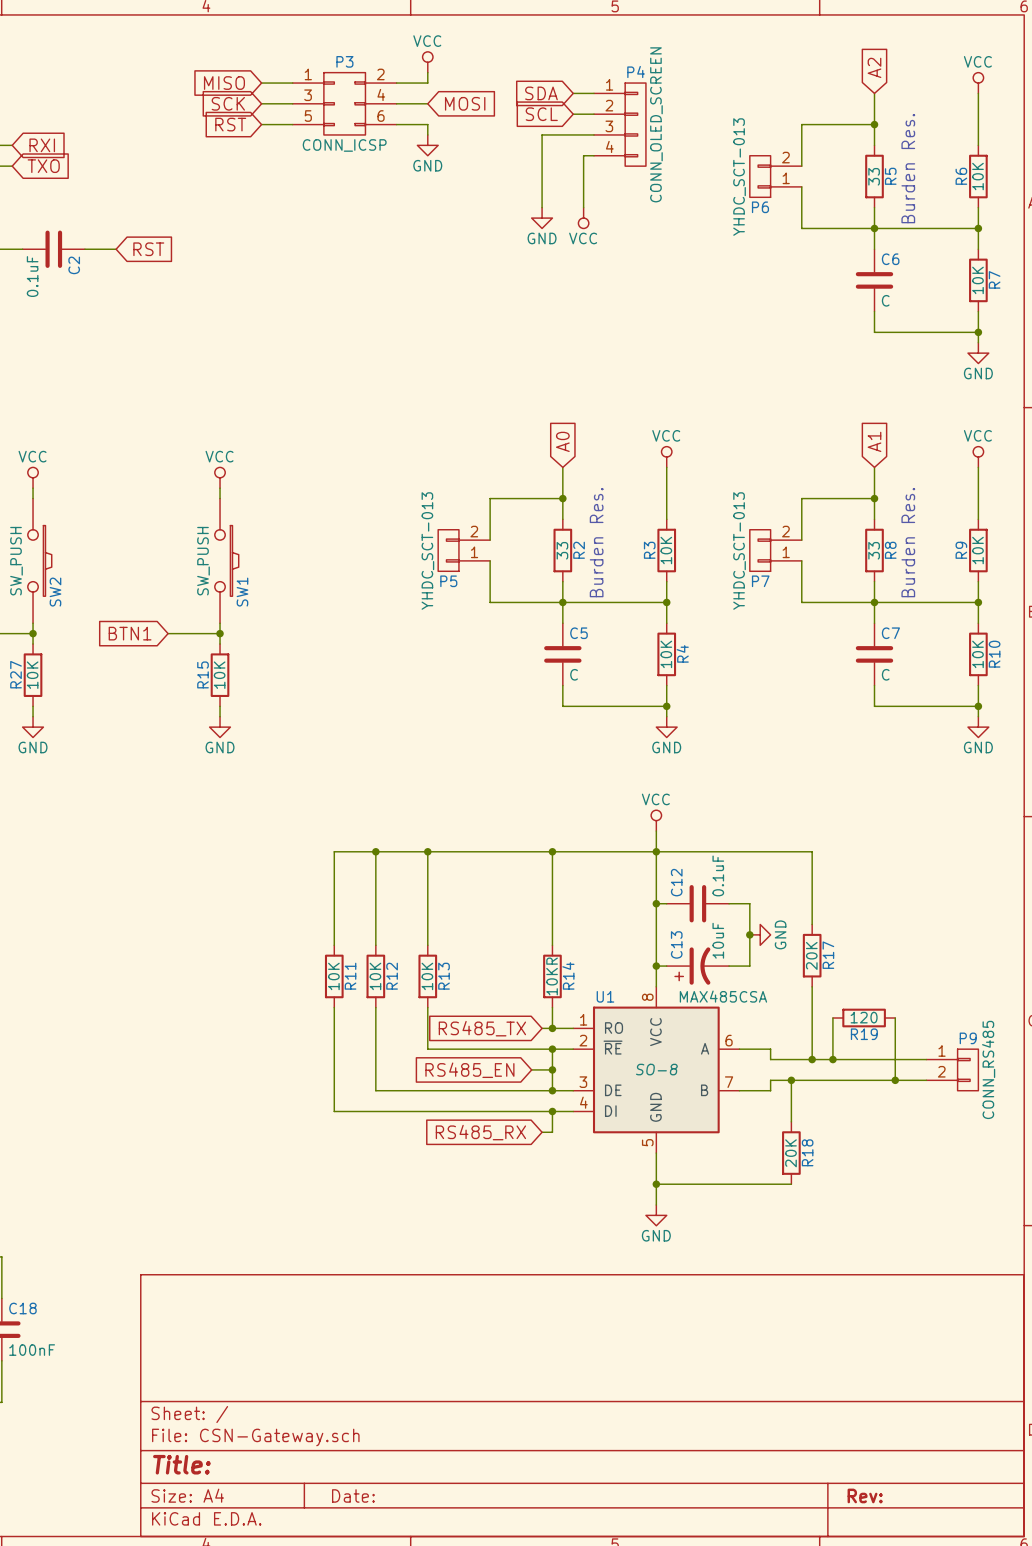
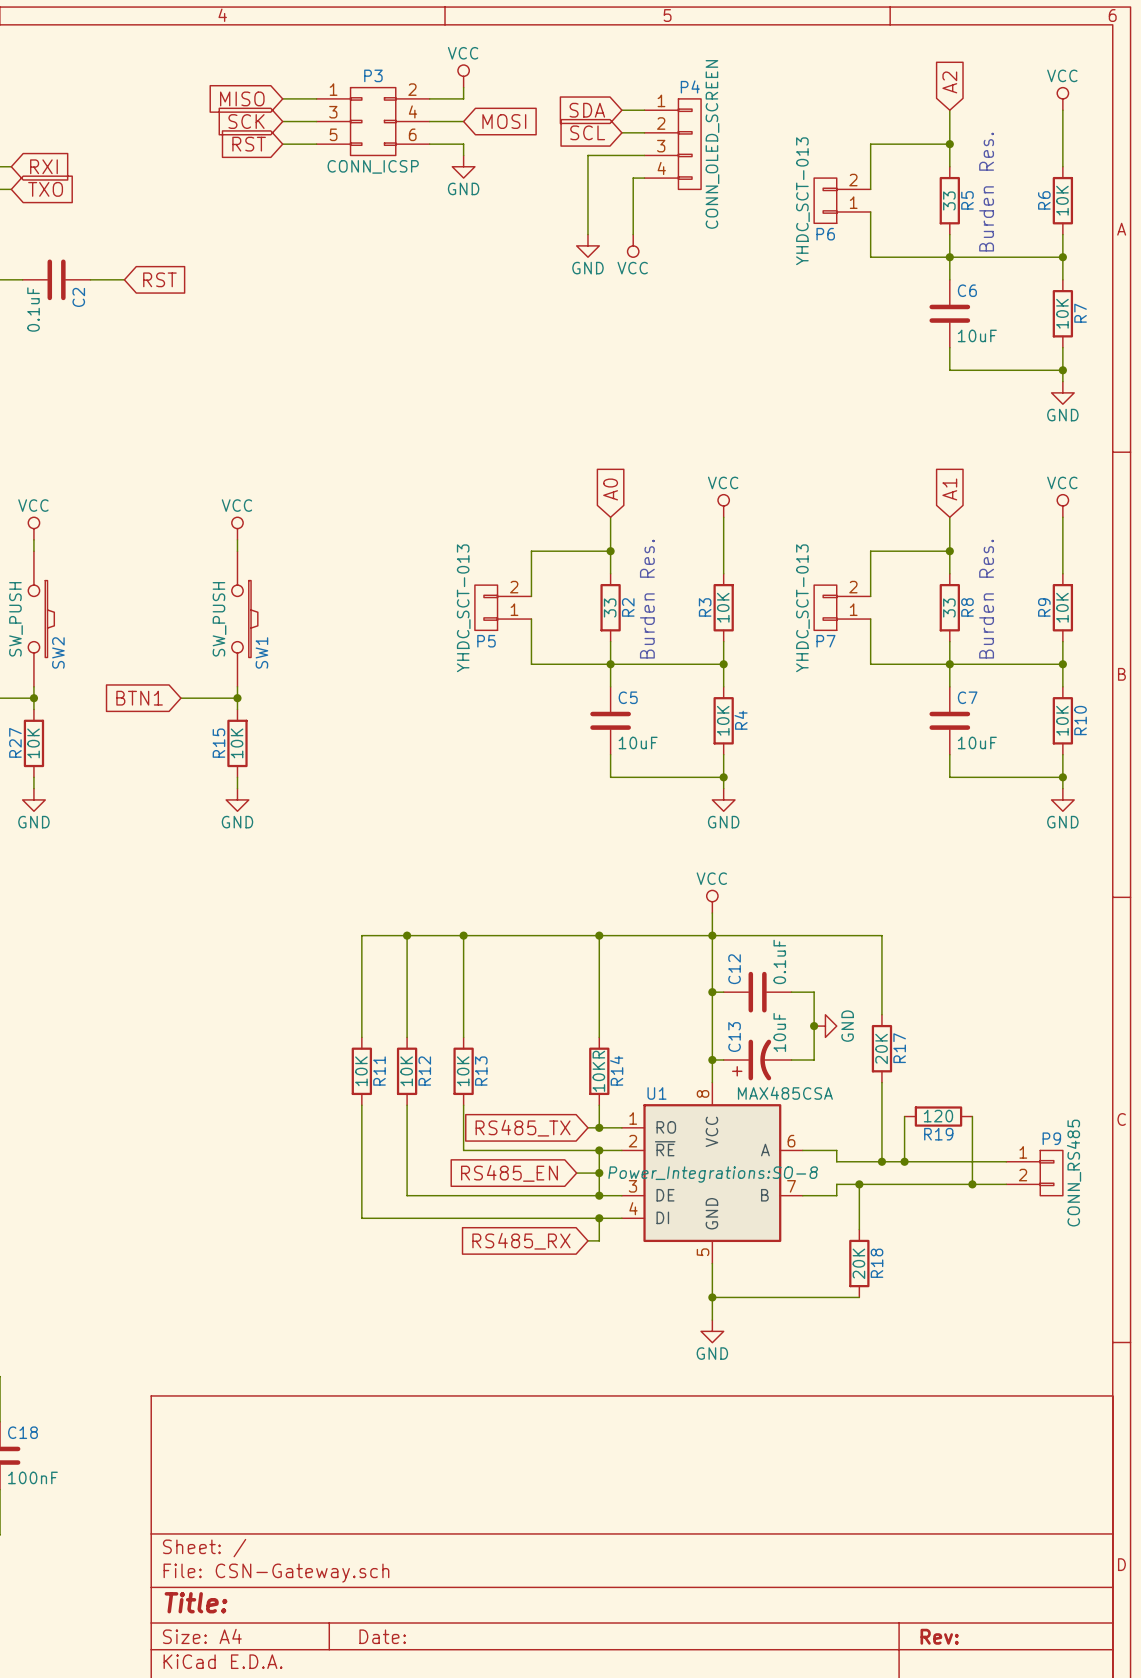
C6 value: C (885, 300) -> 10uF (977, 335)
C5 value: C (574, 674) -> 10uF (638, 742)
C7 value: C (885, 674) -> 10uF (977, 742)
U1 text: SO-8 (656, 1069) -> Power_Integrations:SO-8 (713, 1174)

